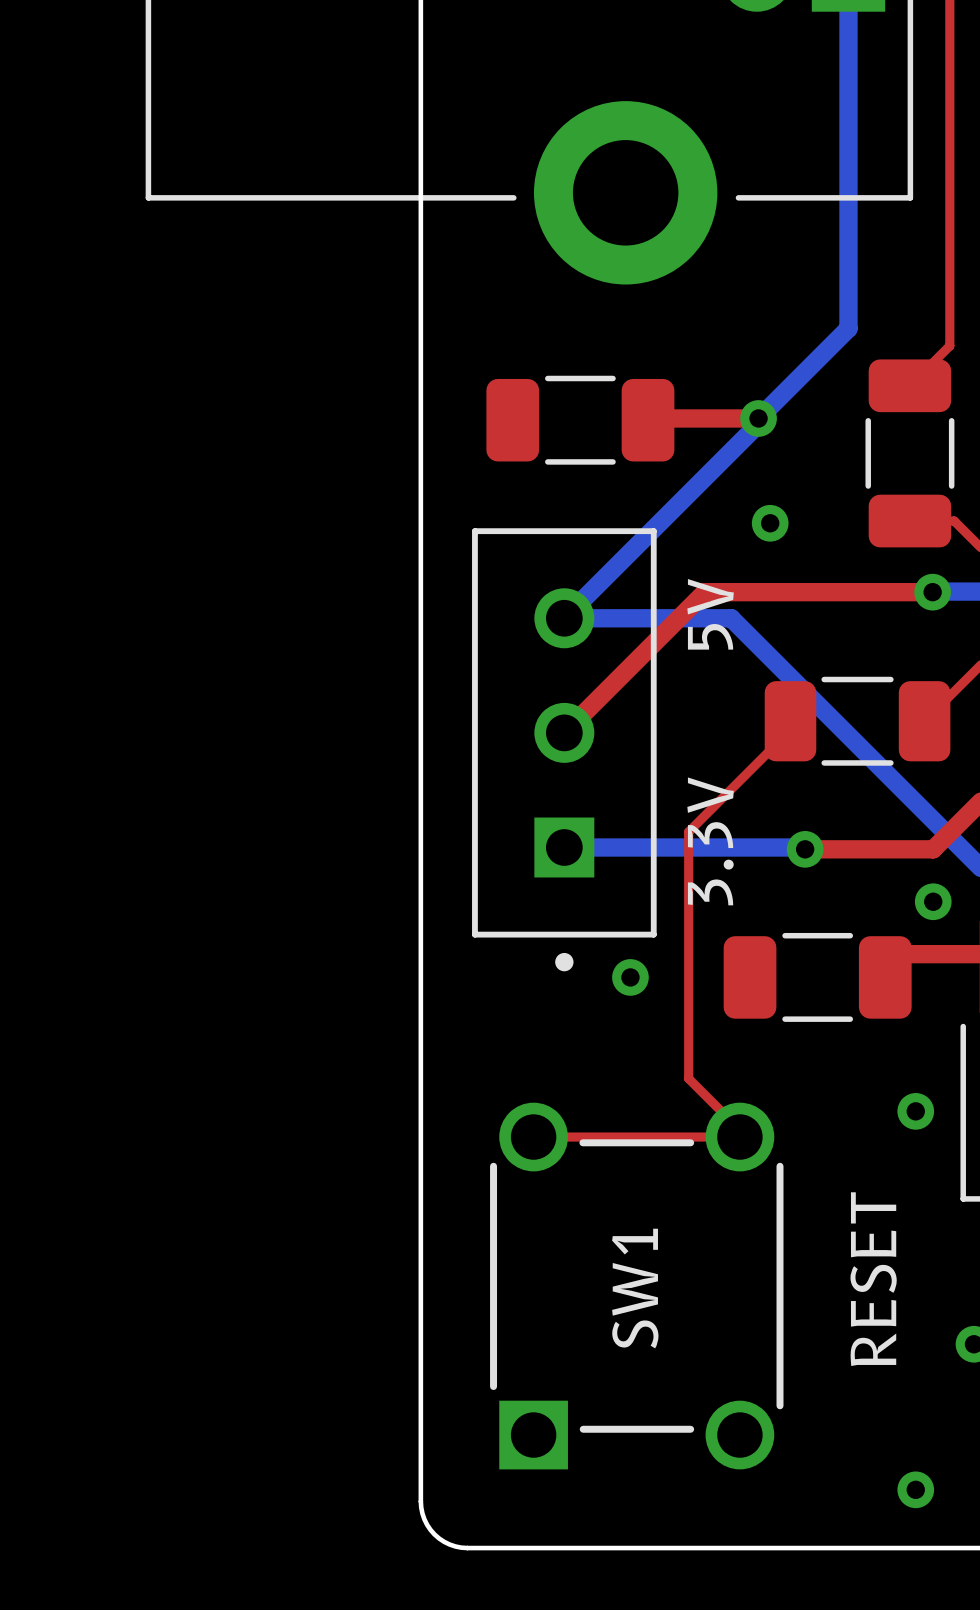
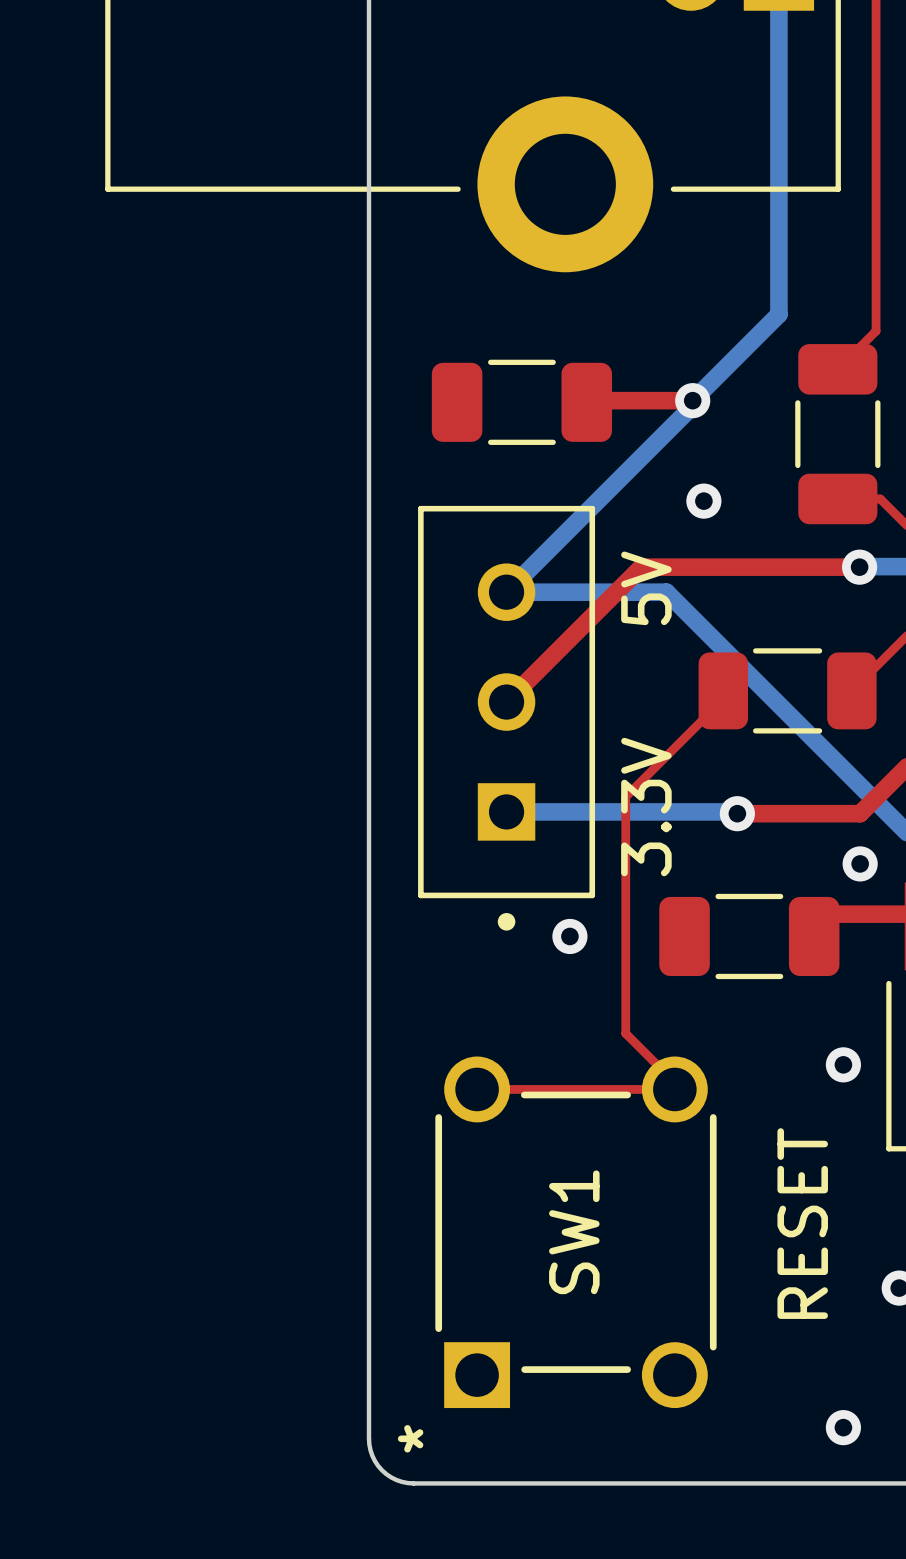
SW1 text: none -> * (410, 1438)

